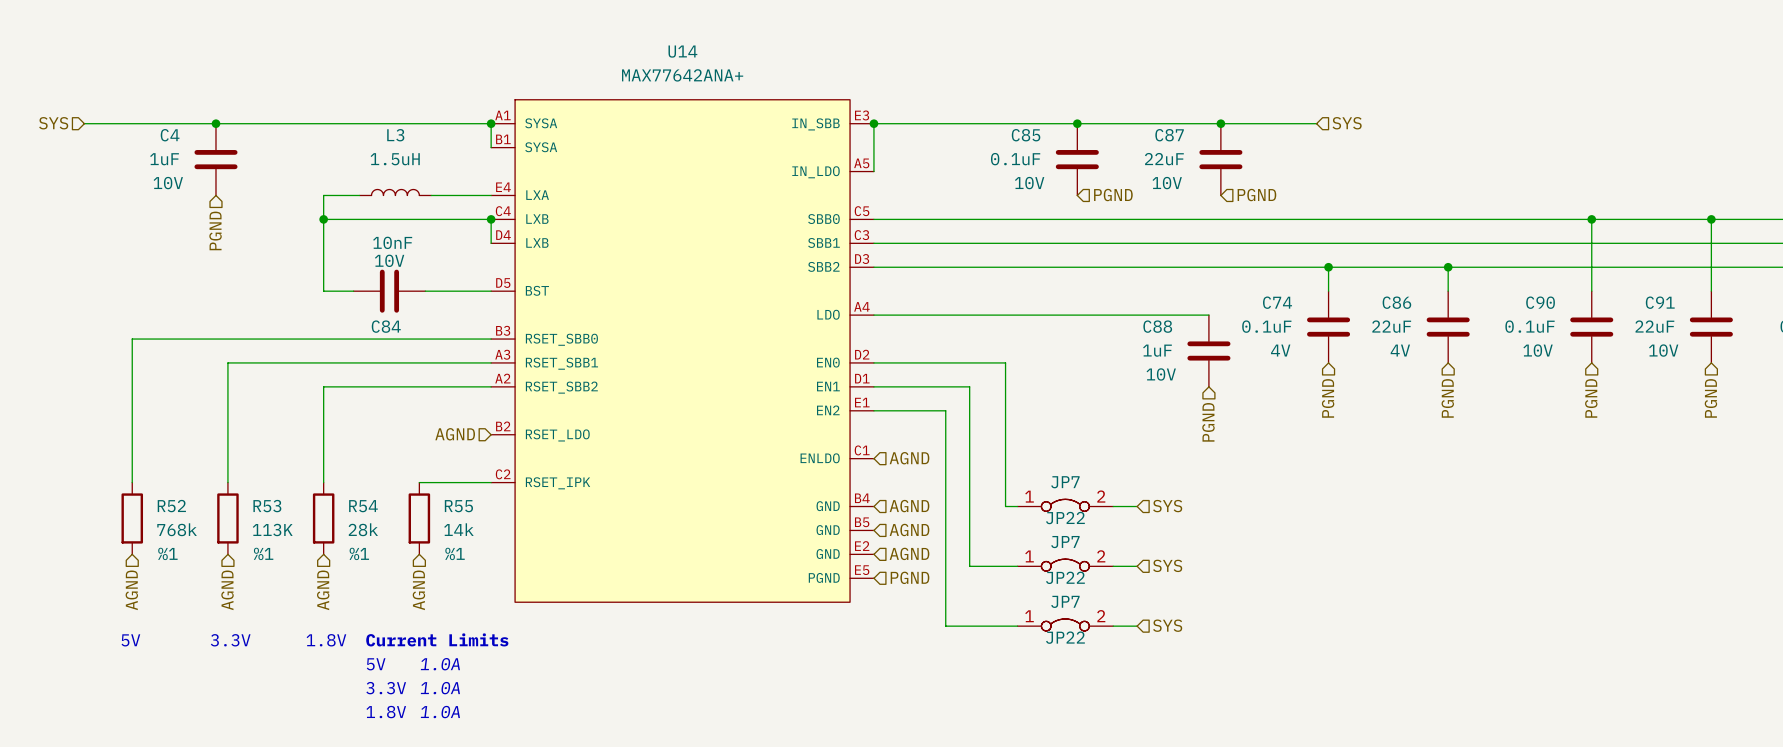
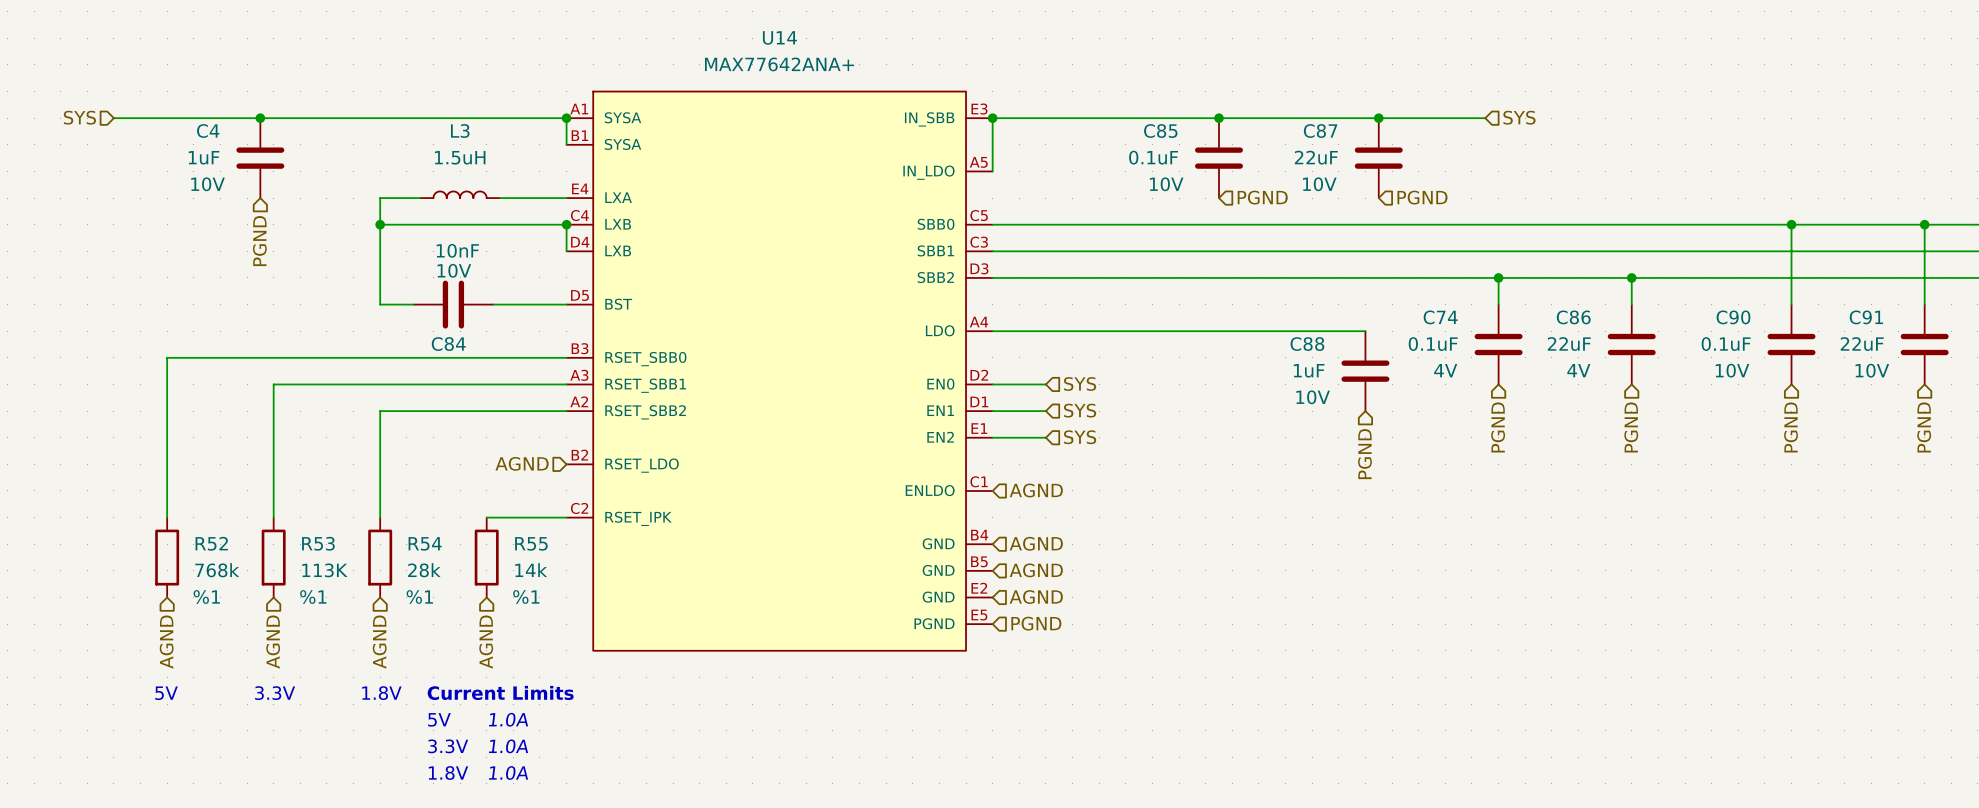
wire: (921, 362) (1005, 362) (1005, 506) (1017, 506) -> none
hierarchical label: none -> SYS (1080, 383)
wire: (921, 386) (969, 386) (969, 566) (1017, 566) -> none
hierarchical label: none -> SYS (1080, 410)
wire: (921, 410) (945, 410) (945, 626) (1017, 626) -> none
hierarchical label: none -> SYS (1080, 437)
JP22: (1065, 505) -> none
JP7: (1065, 505) -> none
wire: (1113, 506) (1137, 506) -> none
hierarchical label: SYS (1167, 506) -> none
JP22: (1065, 565) -> none
JP7: (1065, 565) -> none
hierarchical label: SYS (1167, 565) -> none
wire: (1113, 566) (1137, 566) -> none
JP22: (1065, 624) -> none
JP7: (1065, 624) -> none
hierarchical label: SYS (1167, 625) -> none
wire: (1113, 626) (1137, 626) -> none

